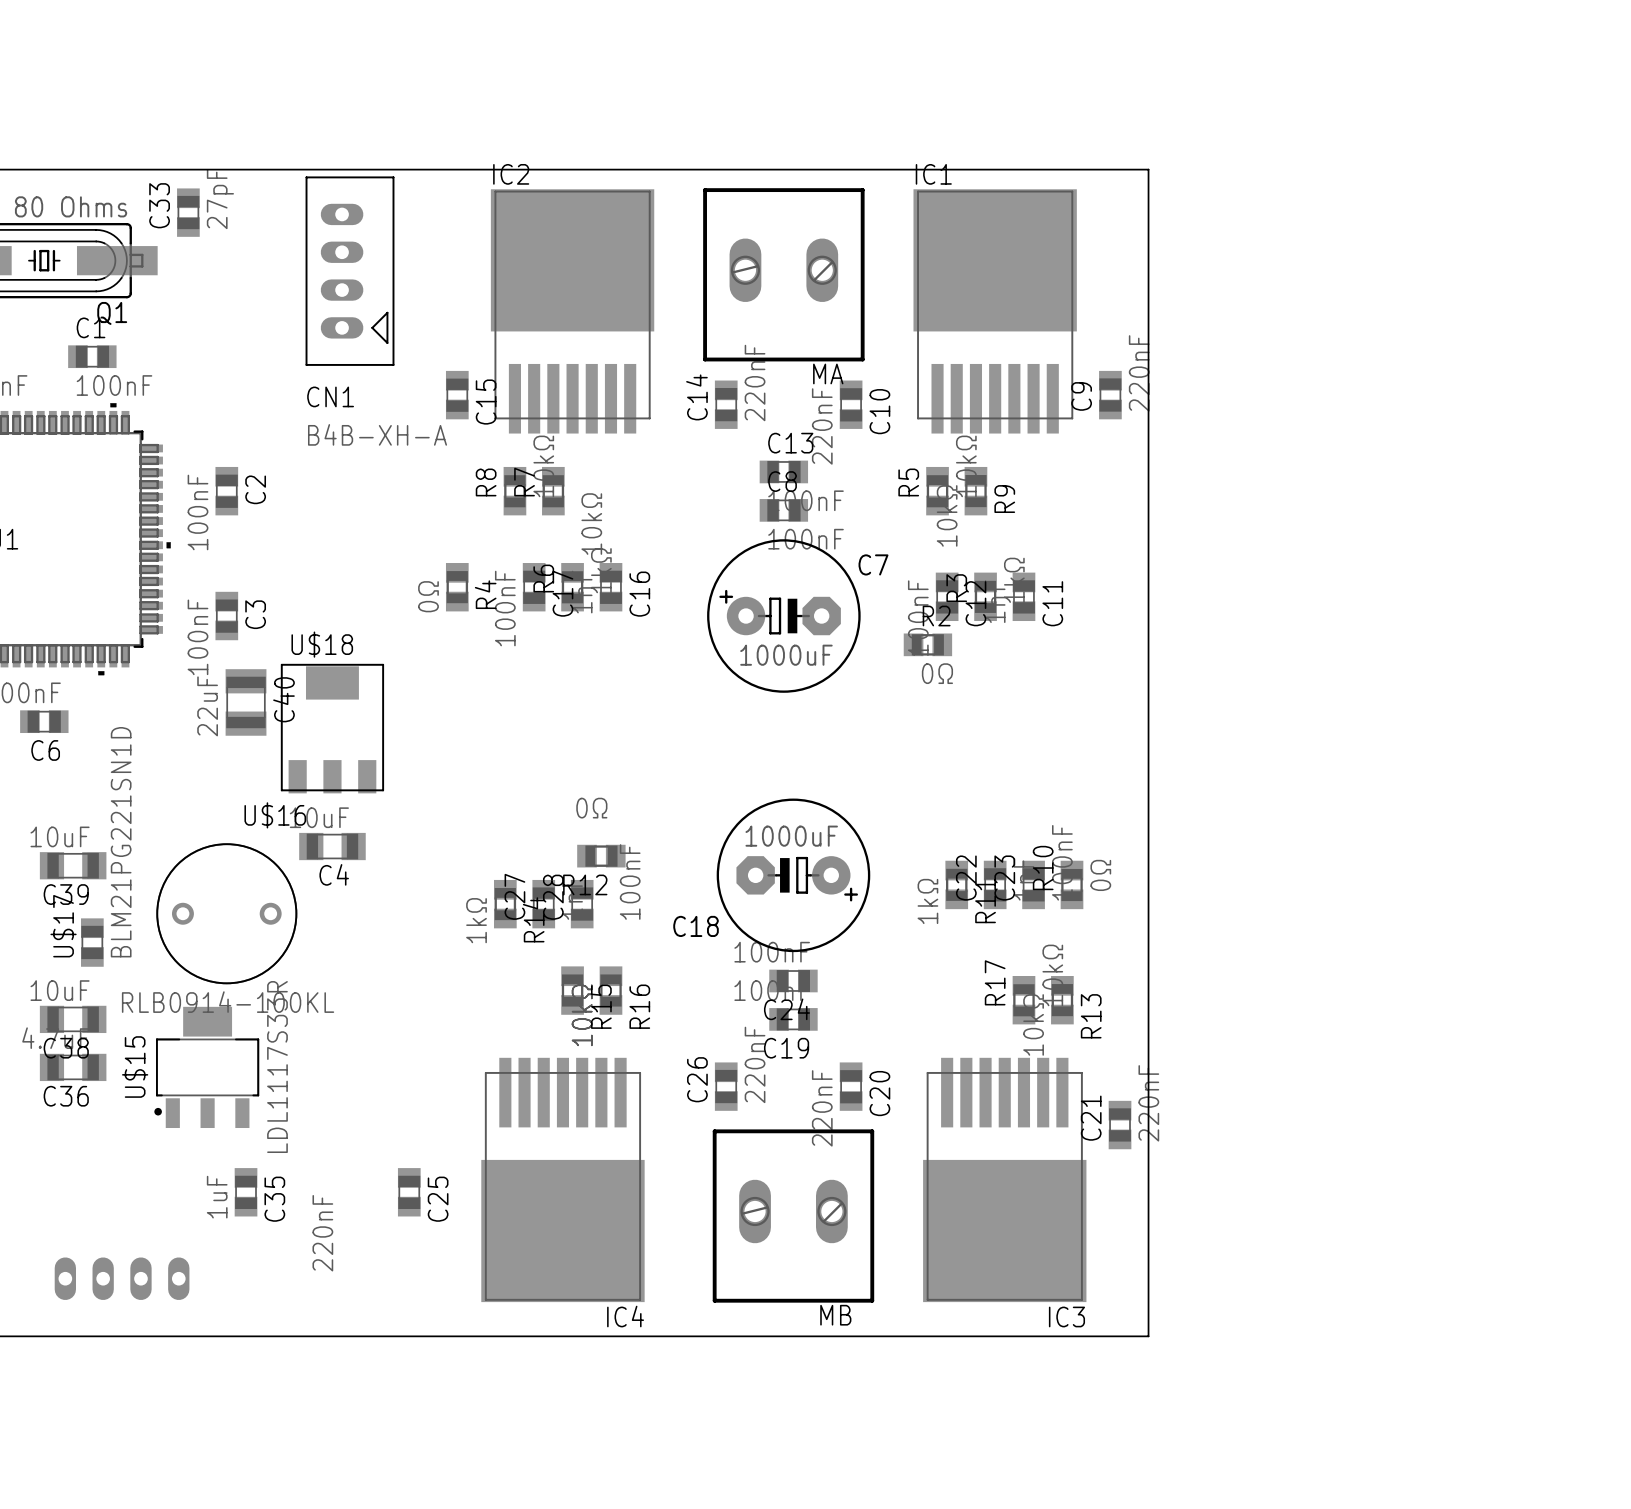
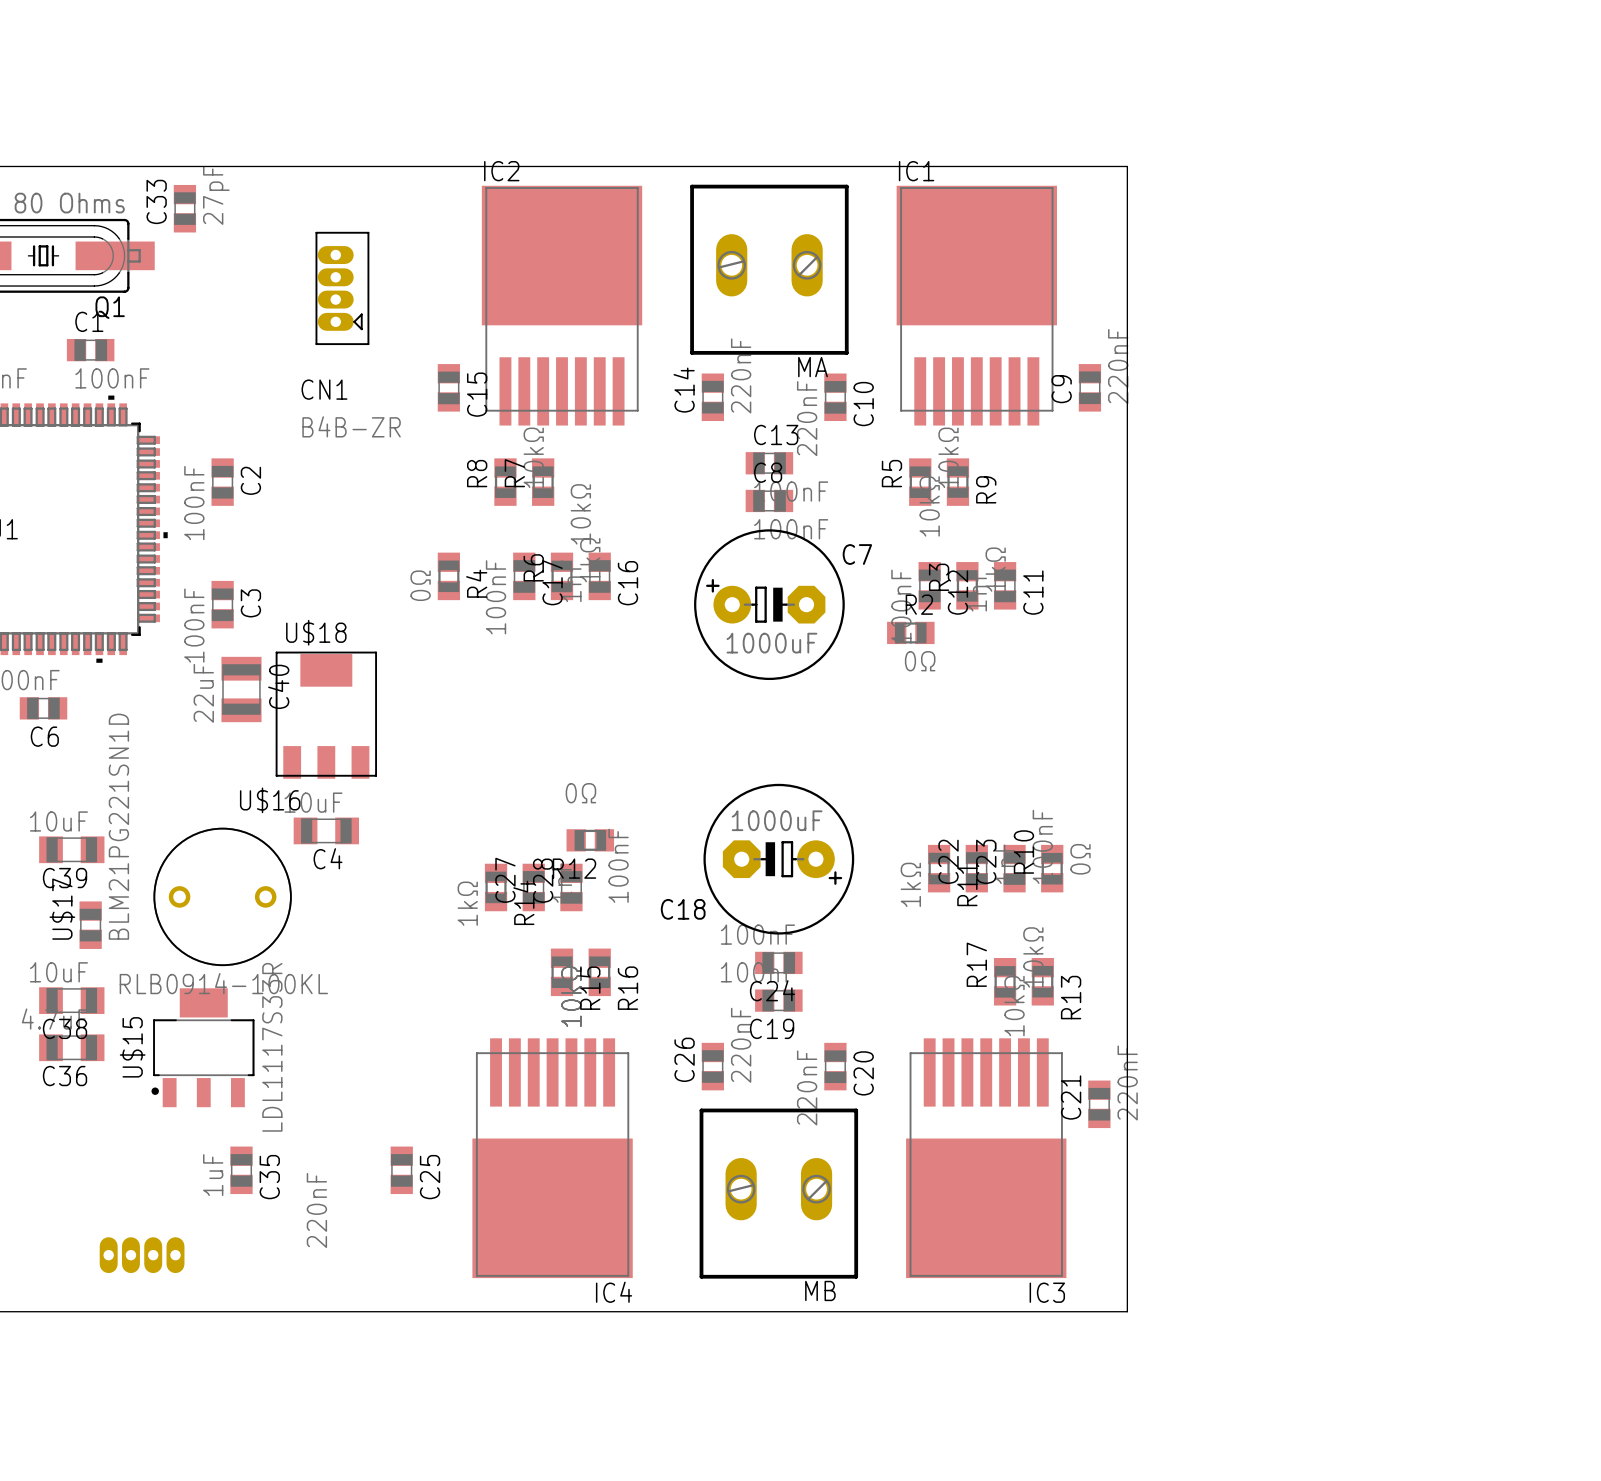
CN1 footprint: [305, 176, 395, 366] -> [315, 231, 370, 346]
CN1 value: B4B-XH-A (377, 434) -> B4B-ZR (351, 426)
part: (122, 1278) -> none
part: none -> (142, 1255)

